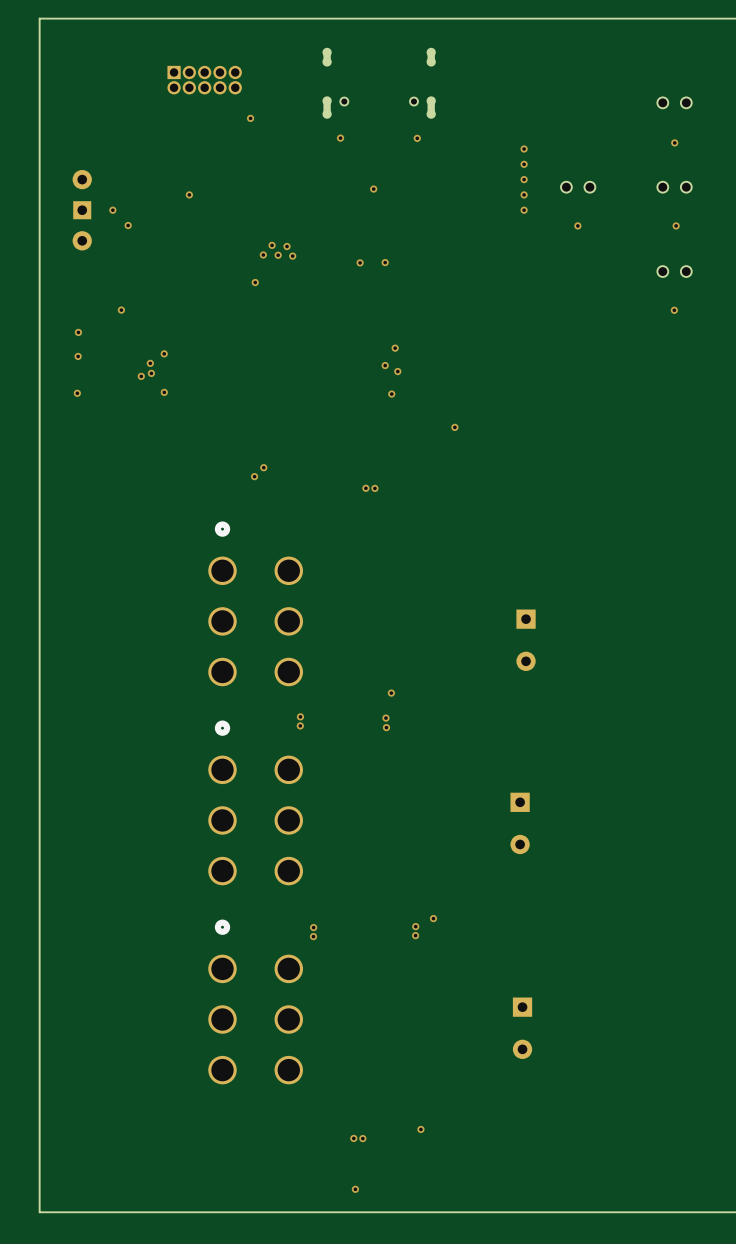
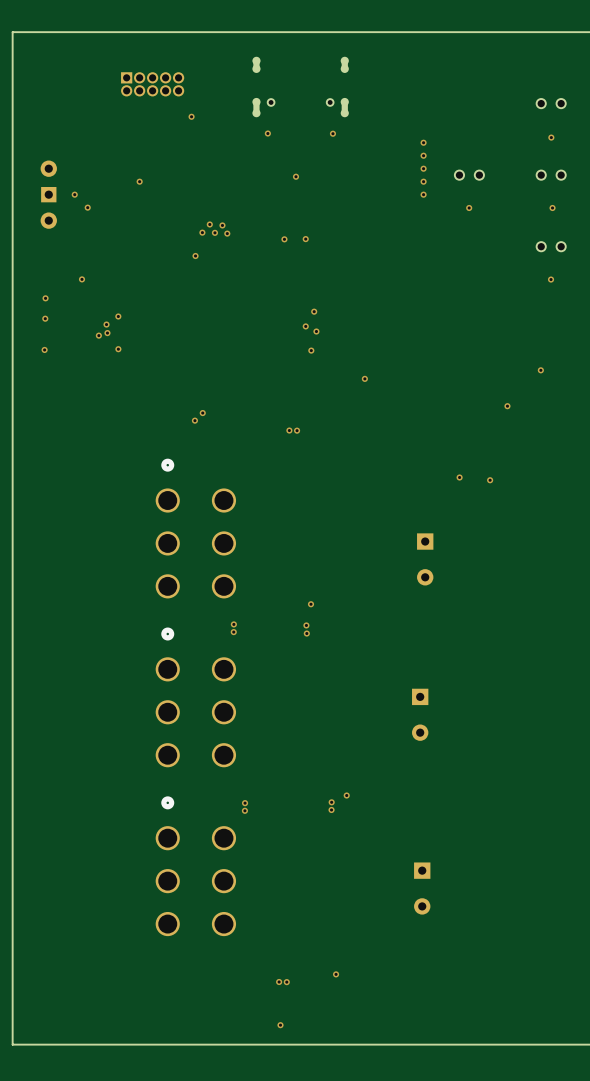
via: none -> (540, 370)
via: none -> (507, 406)
via: none -> (459, 477)
via: none -> (490, 480)

